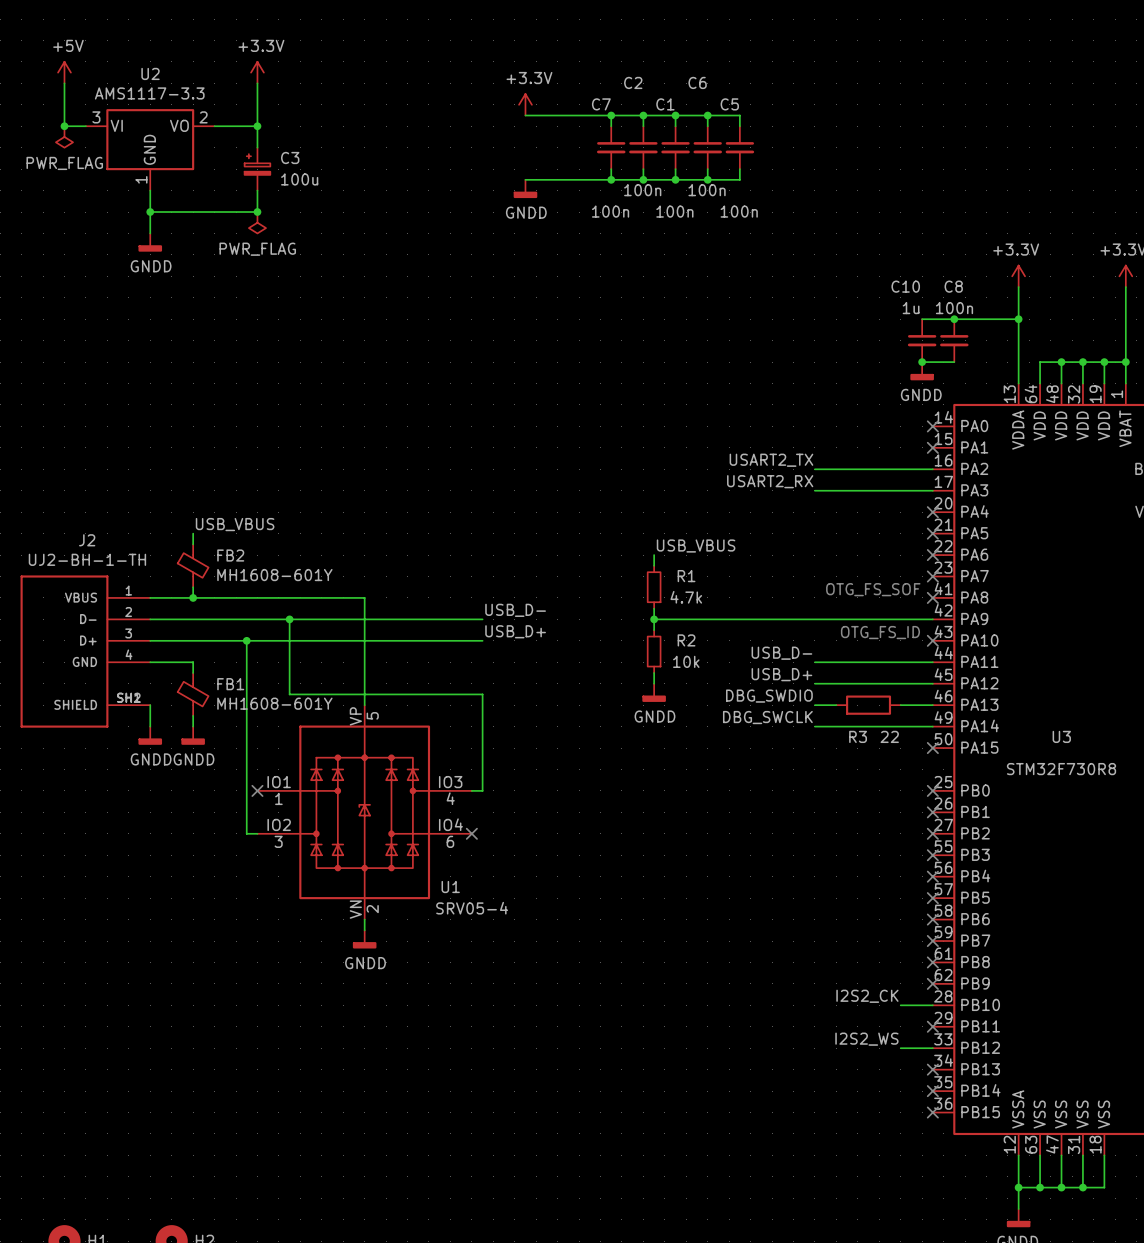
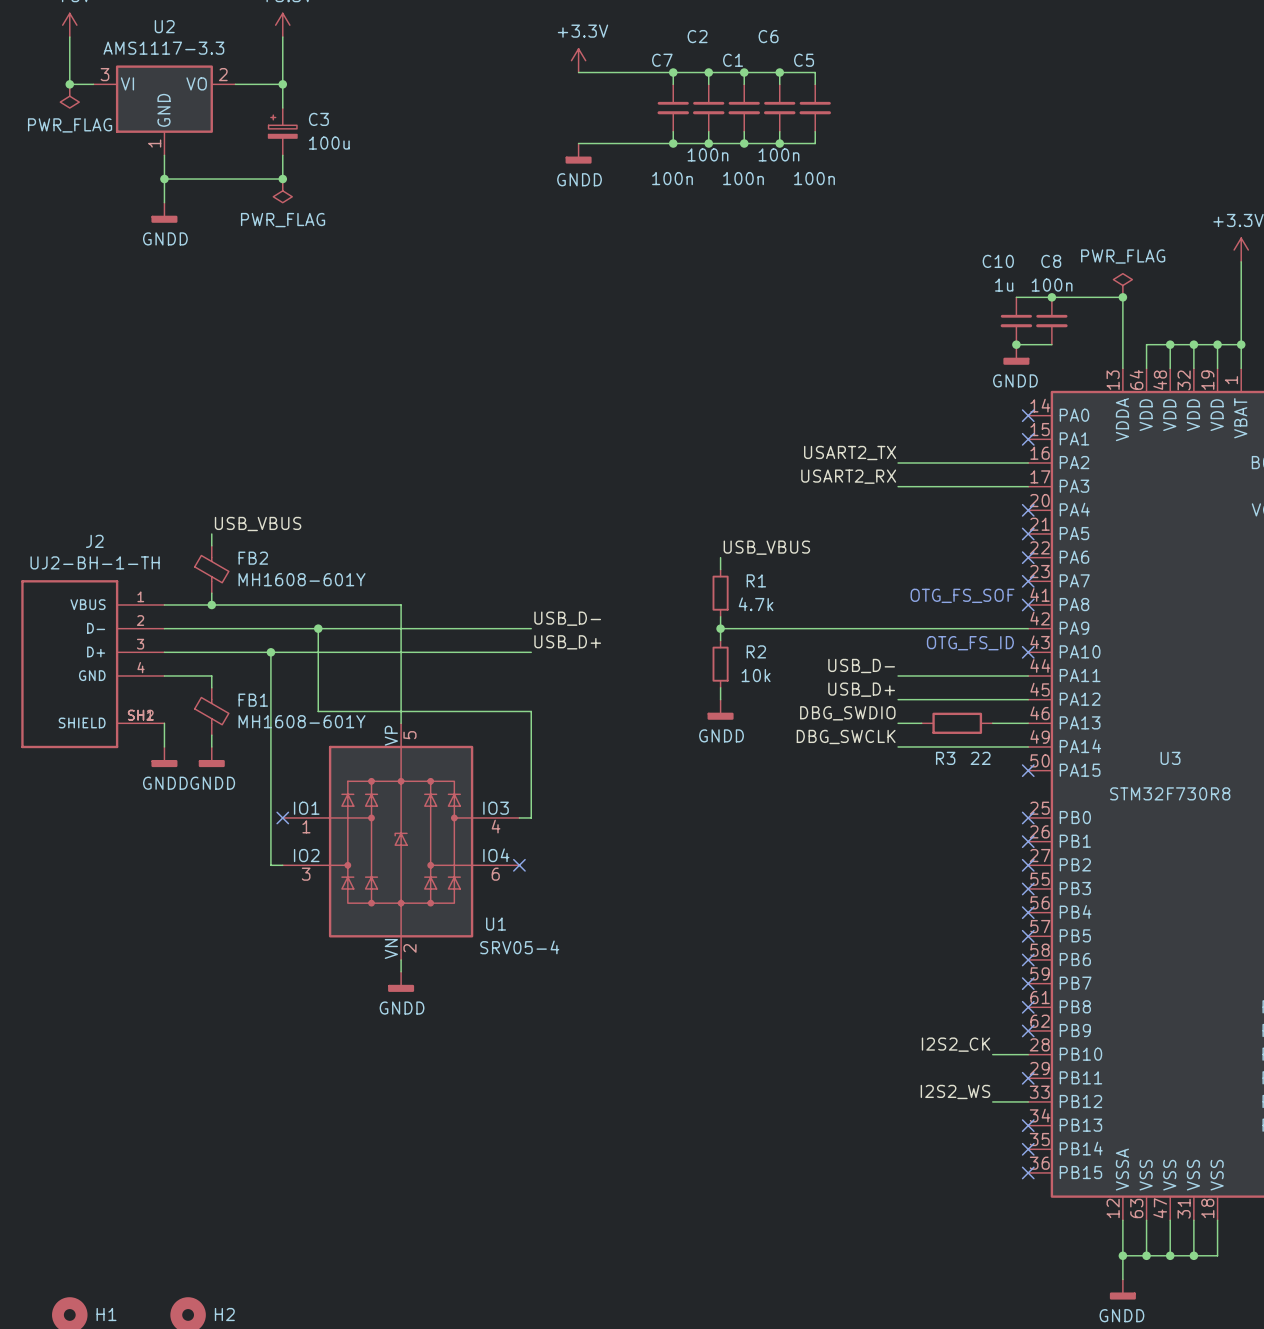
power symbol: +3.3V (1018, 276) -> none
wire: (1018, 287) (1018, 319) -> none
power symbol: none -> PWR_FLAG (1122, 285)

